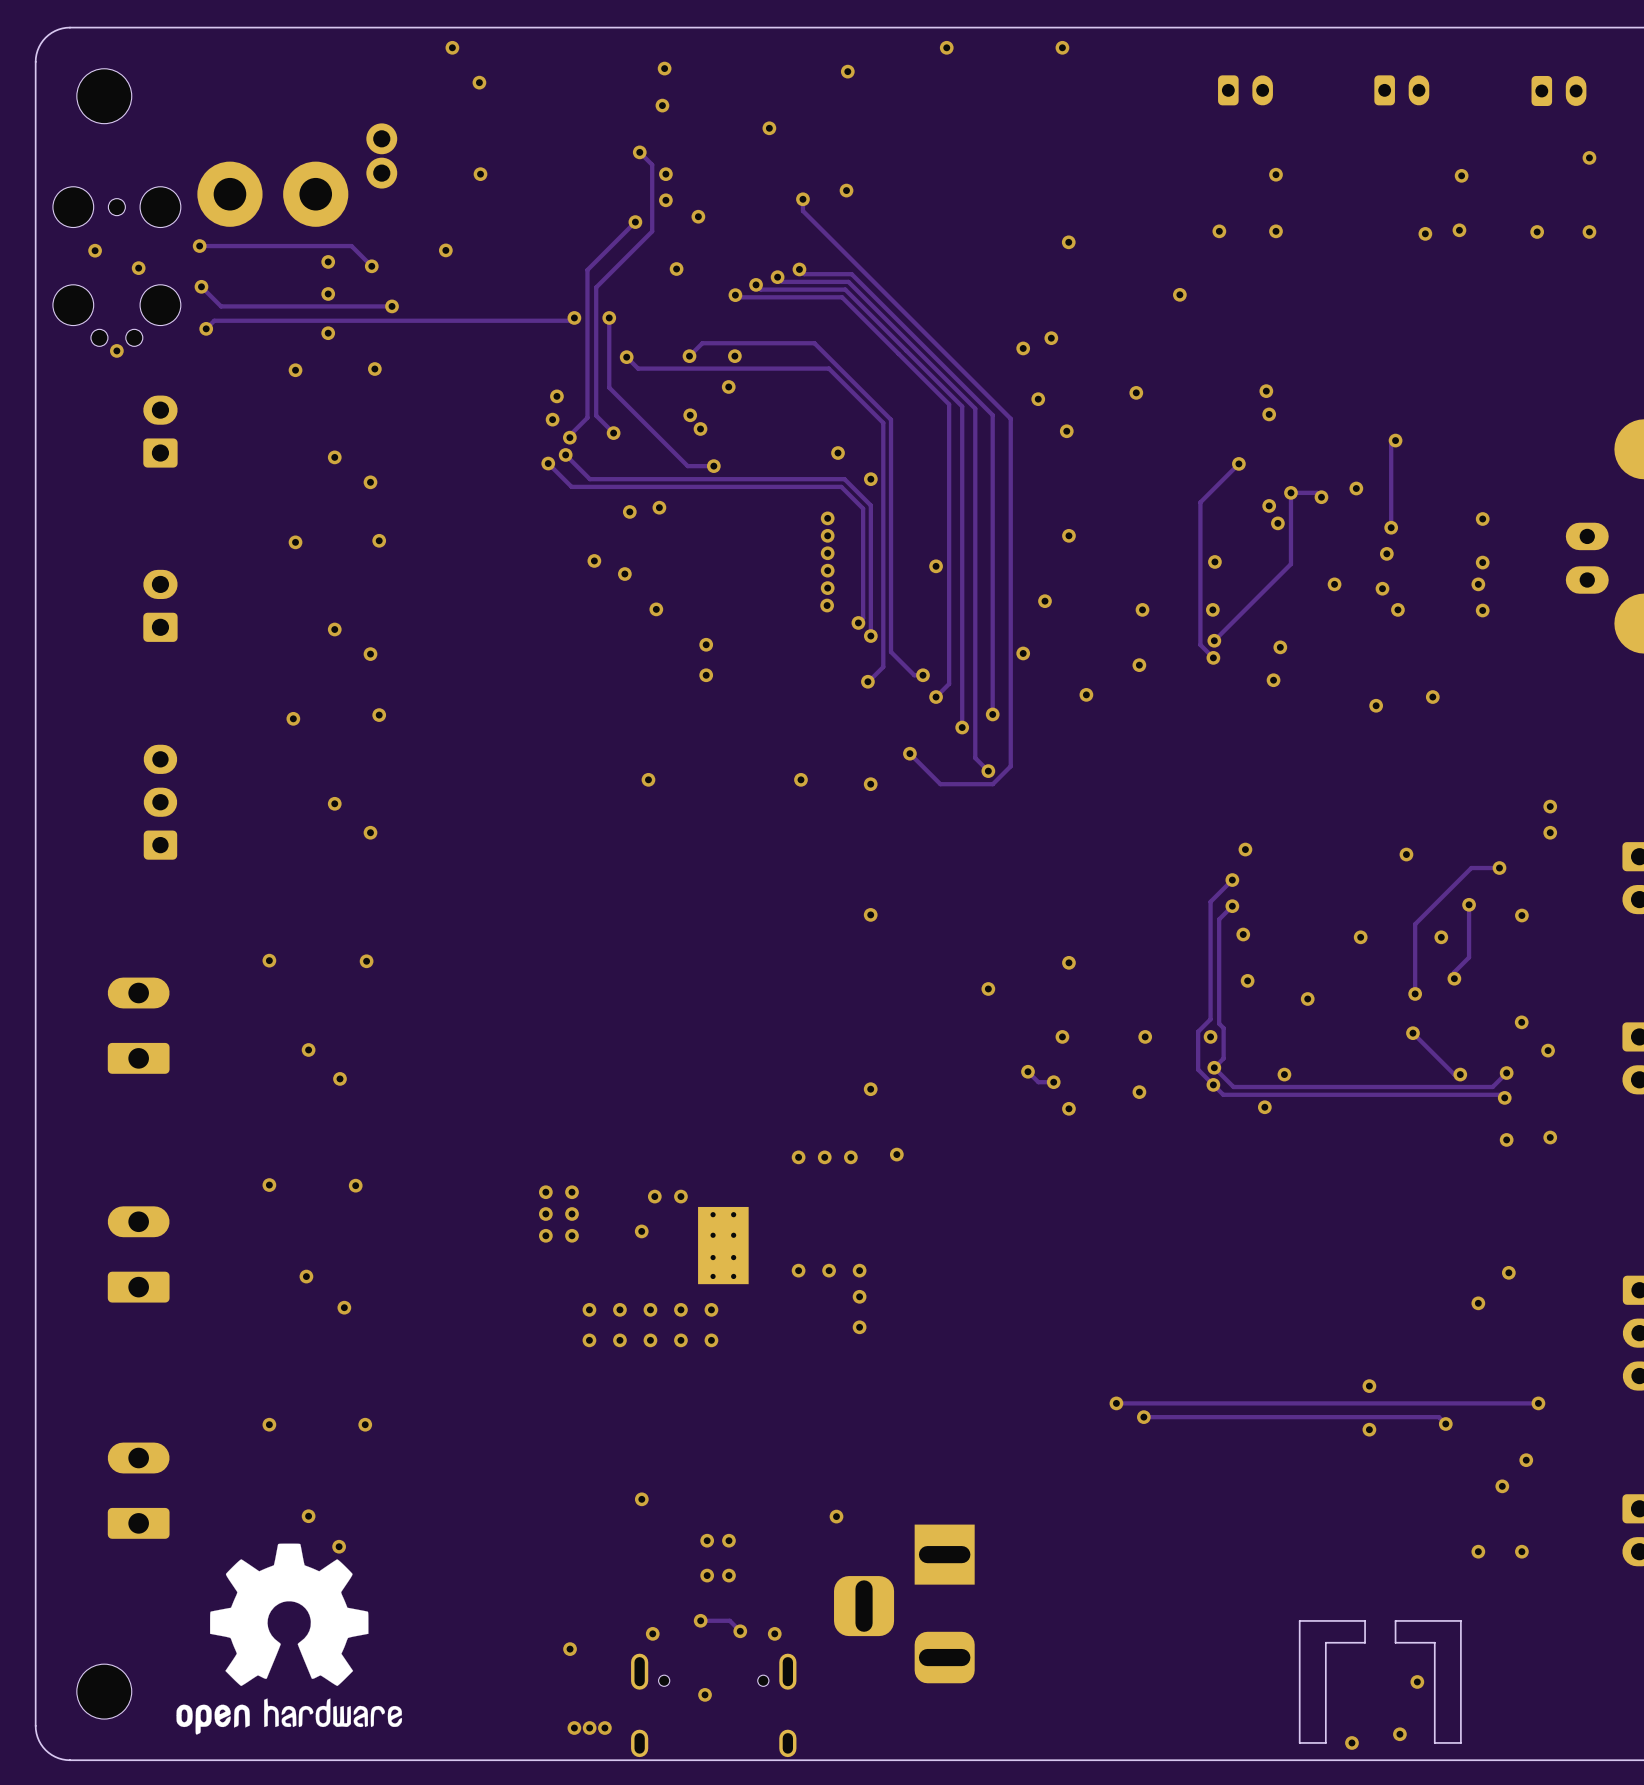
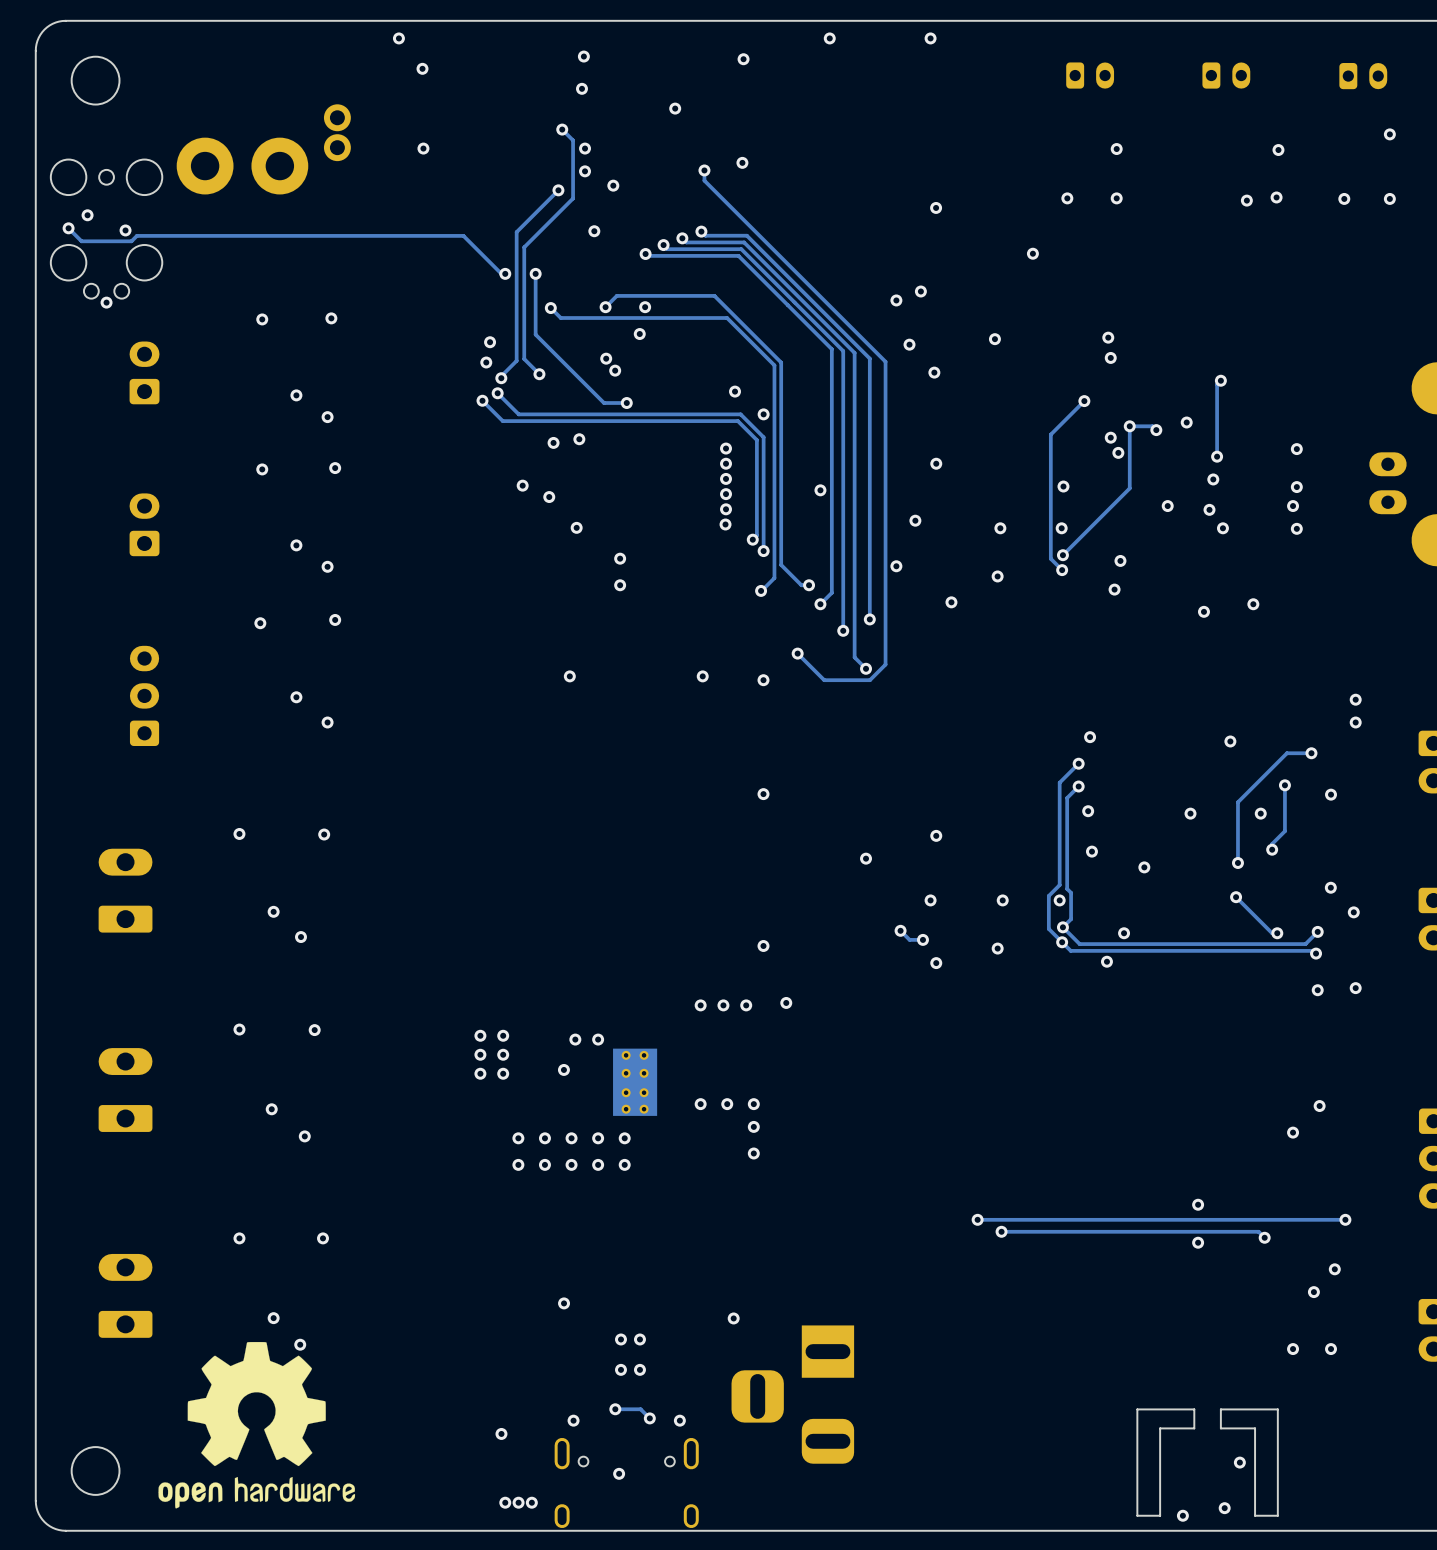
track: (199, 246) (351, 246) (371, 266) -> none
via: (199, 246) -> none
via: (445, 250) -> none
via: (328, 261) -> none
via: none -> (68, 228)
via: (371, 266) -> none
track: (201, 286) (221, 306) (392, 306) -> none
via: (201, 286) -> none
via: (328, 293) -> none
via: (392, 306) -> none
track: (574, 317) (571, 320) (214, 320) (206, 328) -> (505, 273) (501, 273) (463, 235) (136, 235) (131, 241) (81, 241) (68, 228)
via: (206, 328) -> none
via: (328, 333) -> none

